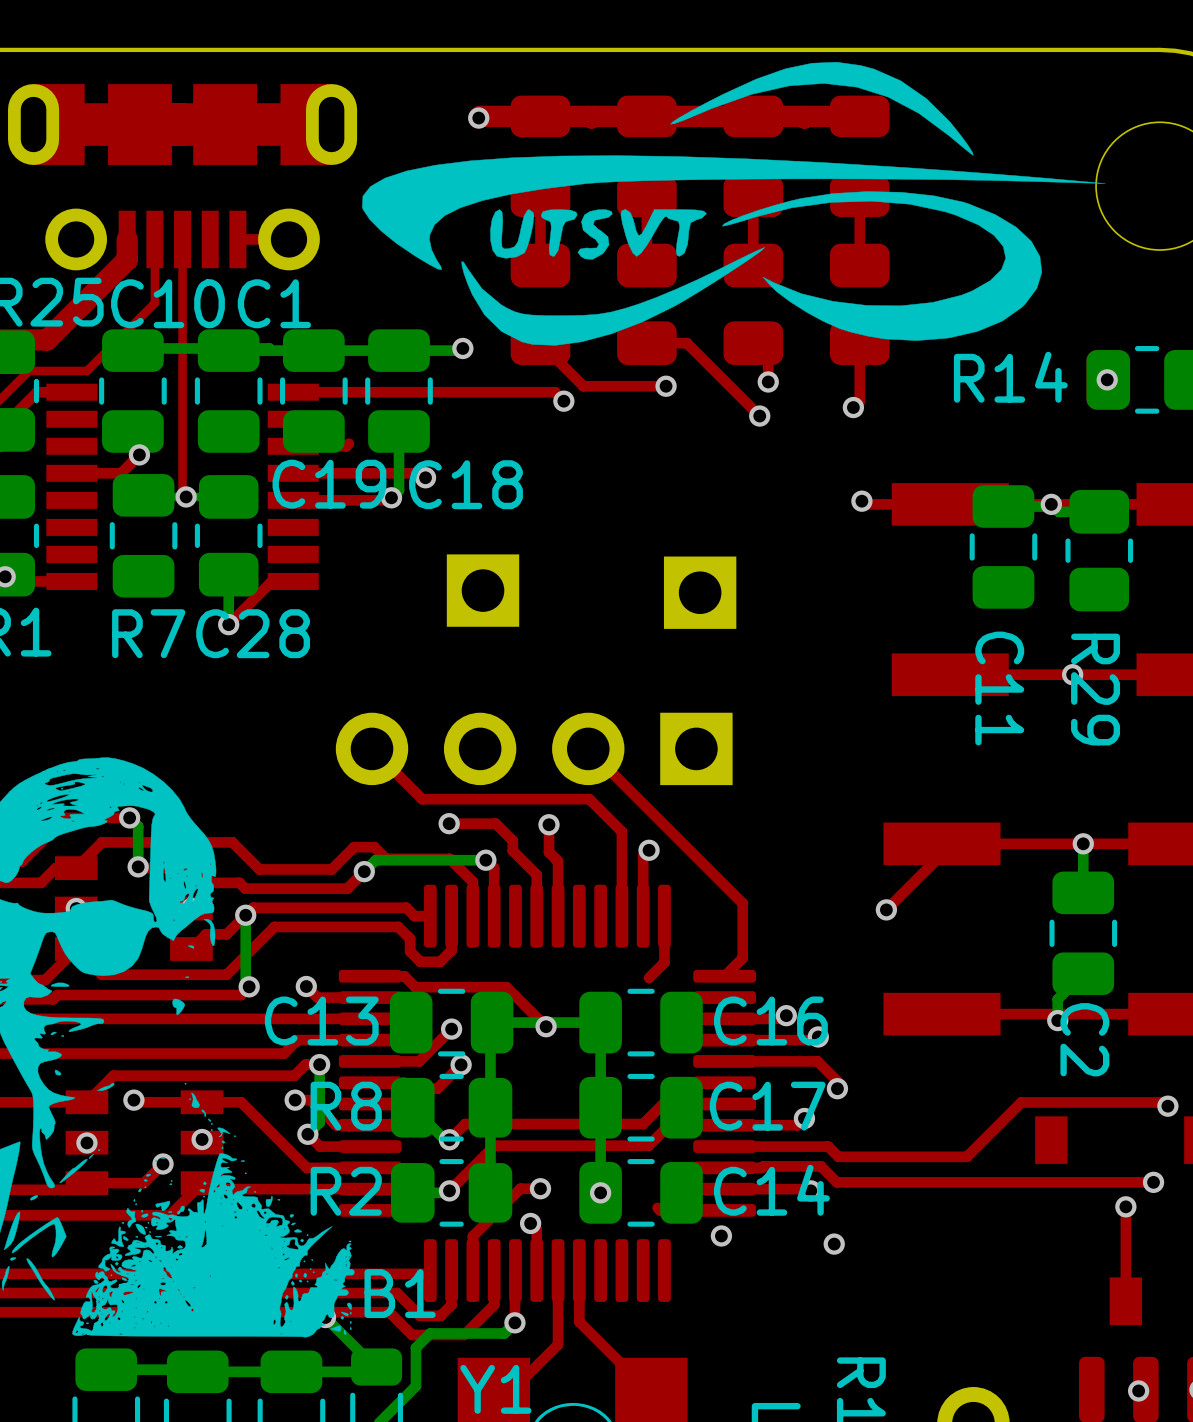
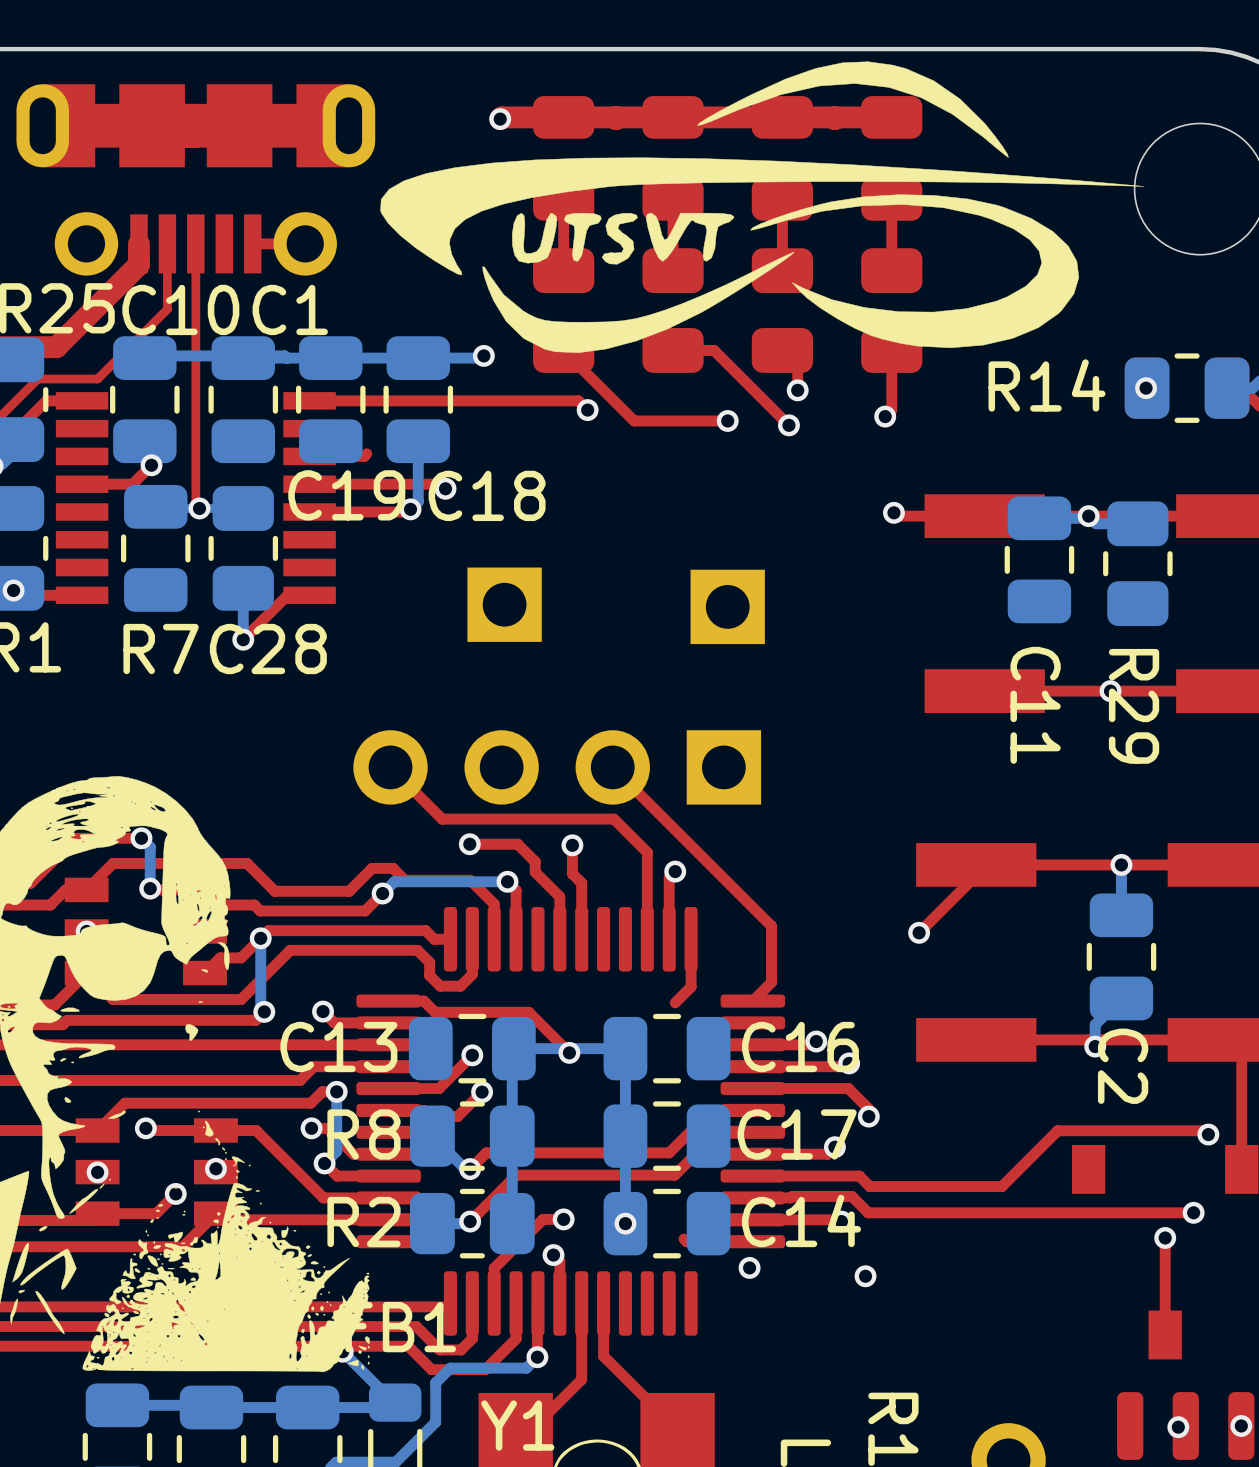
top track: (666, 386) (583, 386) -> (727, 420) (634, 420) (607, 394)
via position: (666, 386) -> (727, 420)

